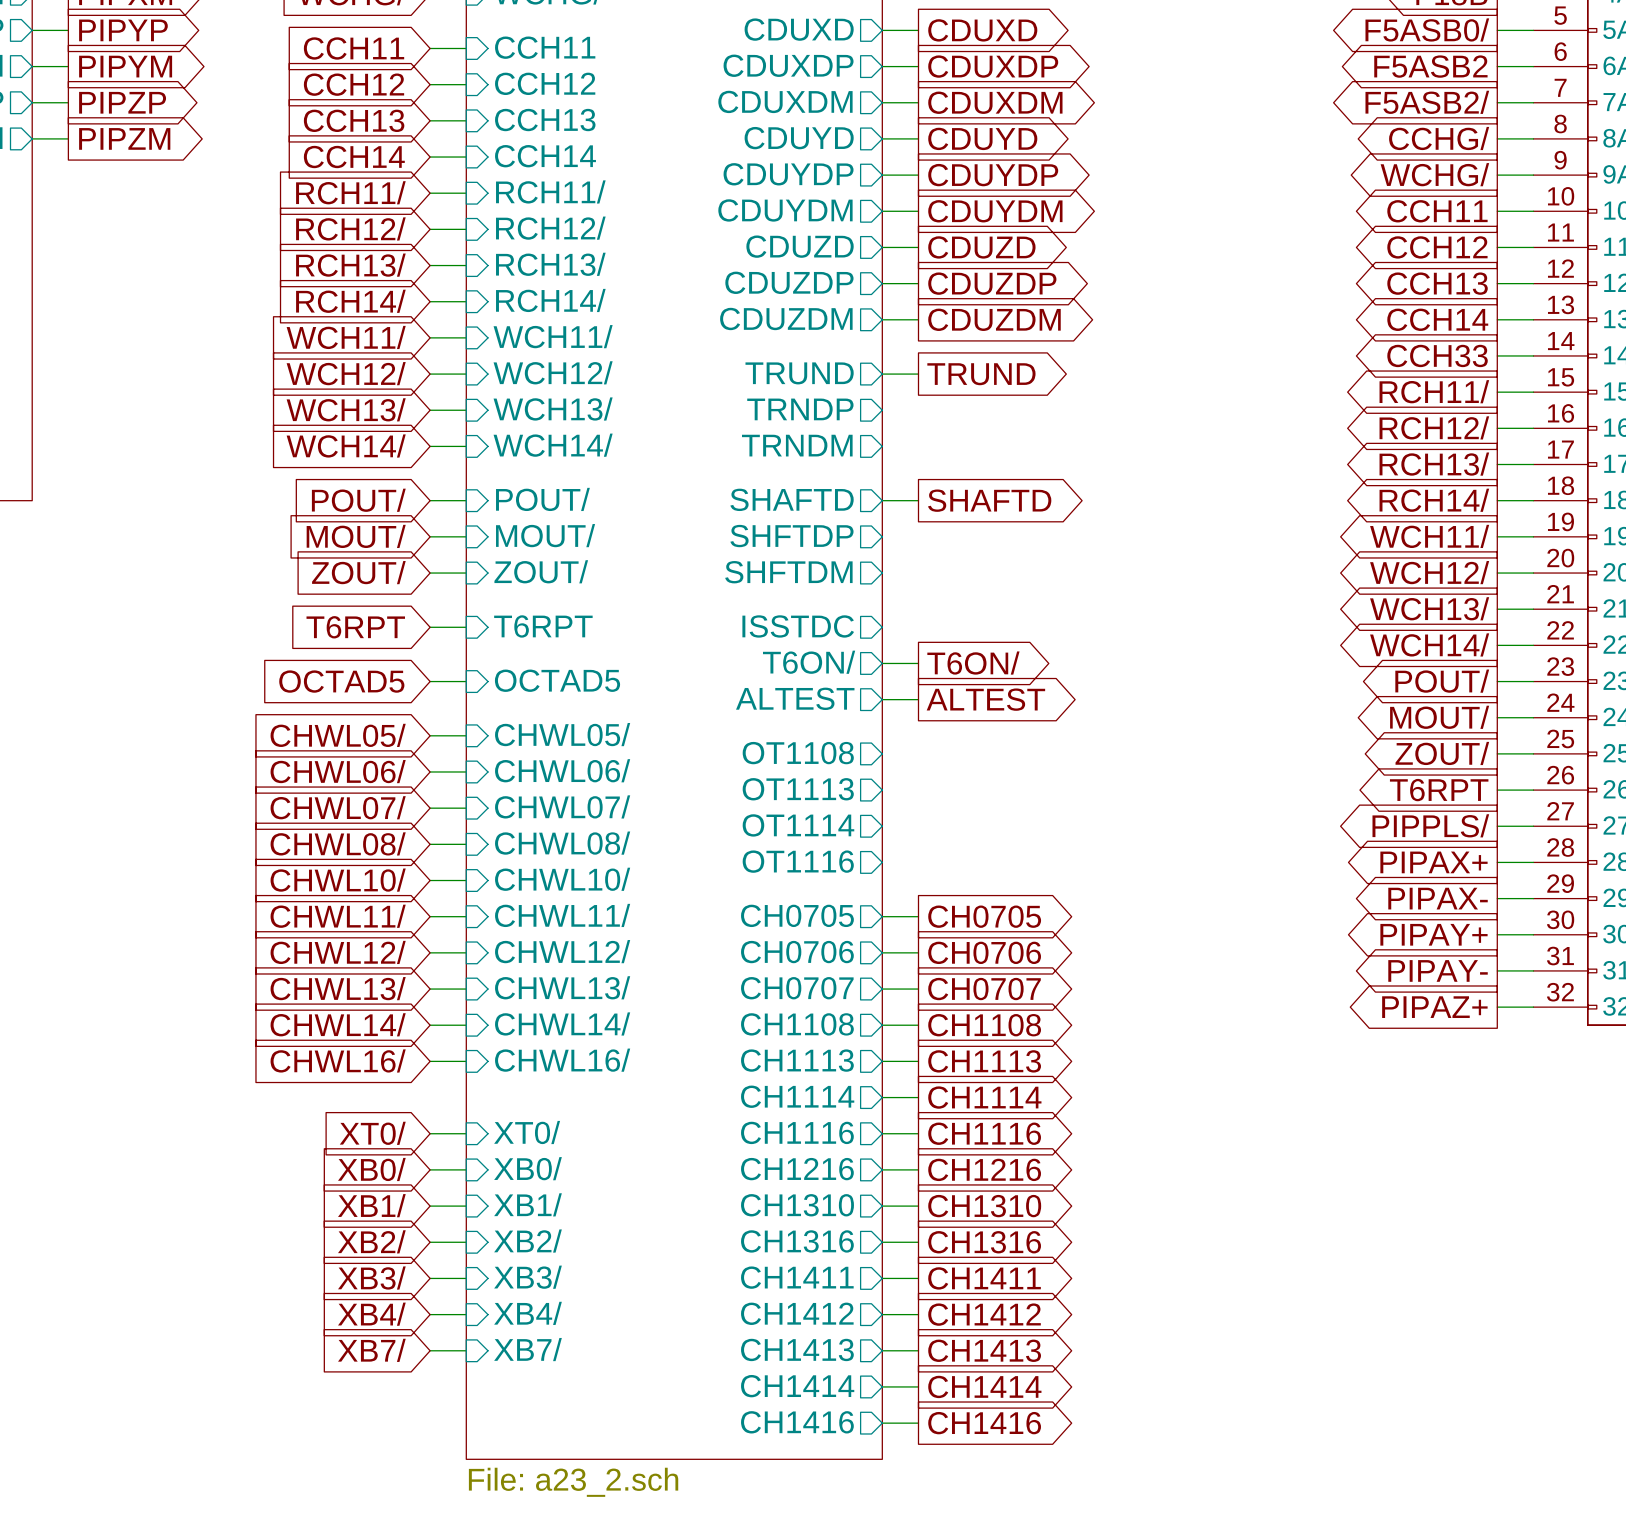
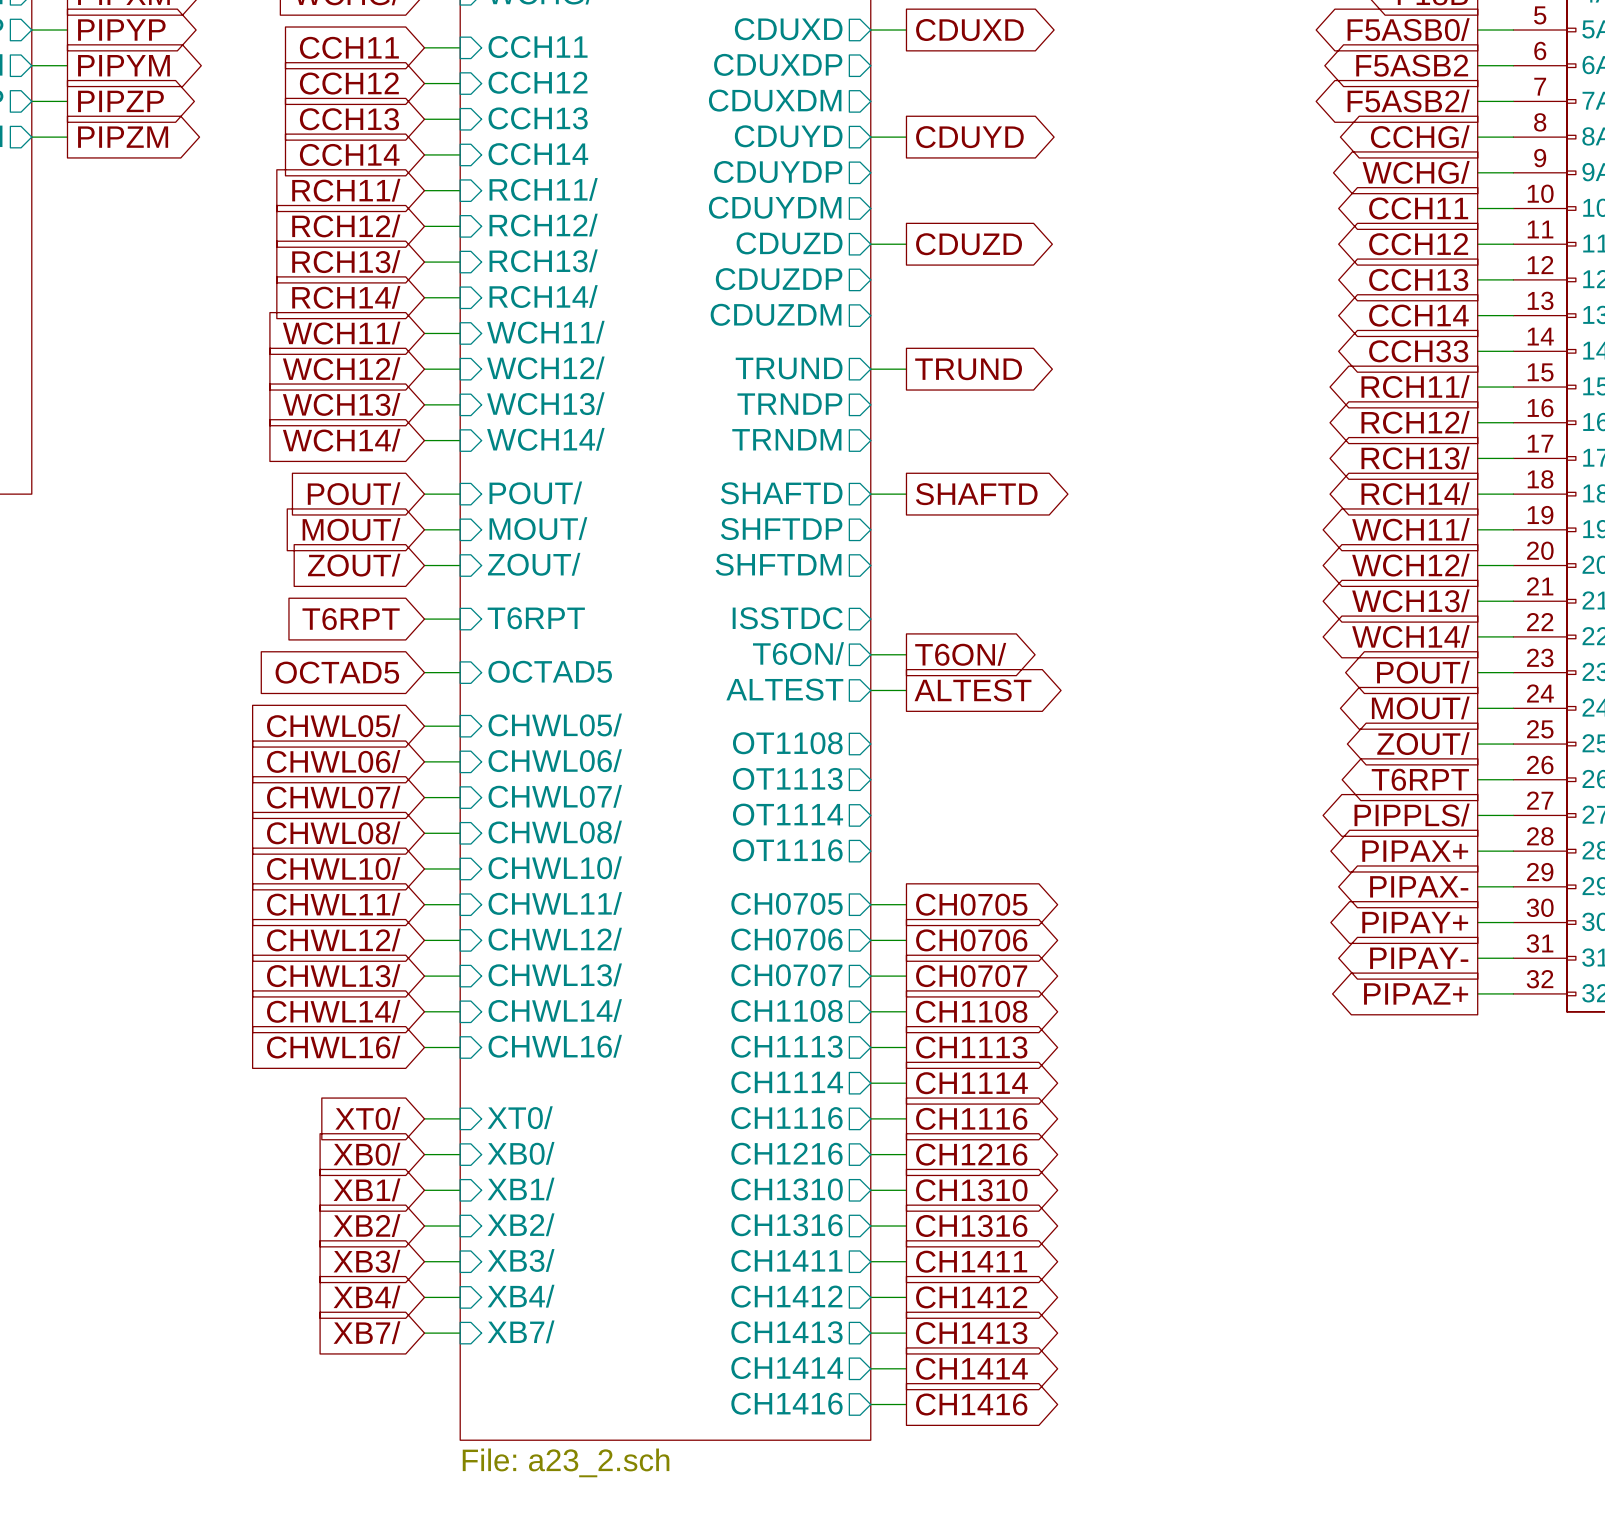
wire: (882, 66) (918, 66) -> none
global label: CDUXDP (993, 66) -> none
wire: (882, 102) (918, 102) -> none
global label: CDUXDM (995, 102) -> none
wire: (882, 175) (918, 175) -> none
global label: CDUYDP (993, 175) -> none
wire: (882, 211) (918, 211) -> none
global label: CDUYDM (995, 211) -> none
wire: (882, 283) (918, 283) -> none
global label: CDUZDP (992, 283) -> none
wire: (882, 319) (918, 319) -> none
global label: CDUZDM (994, 319) -> none

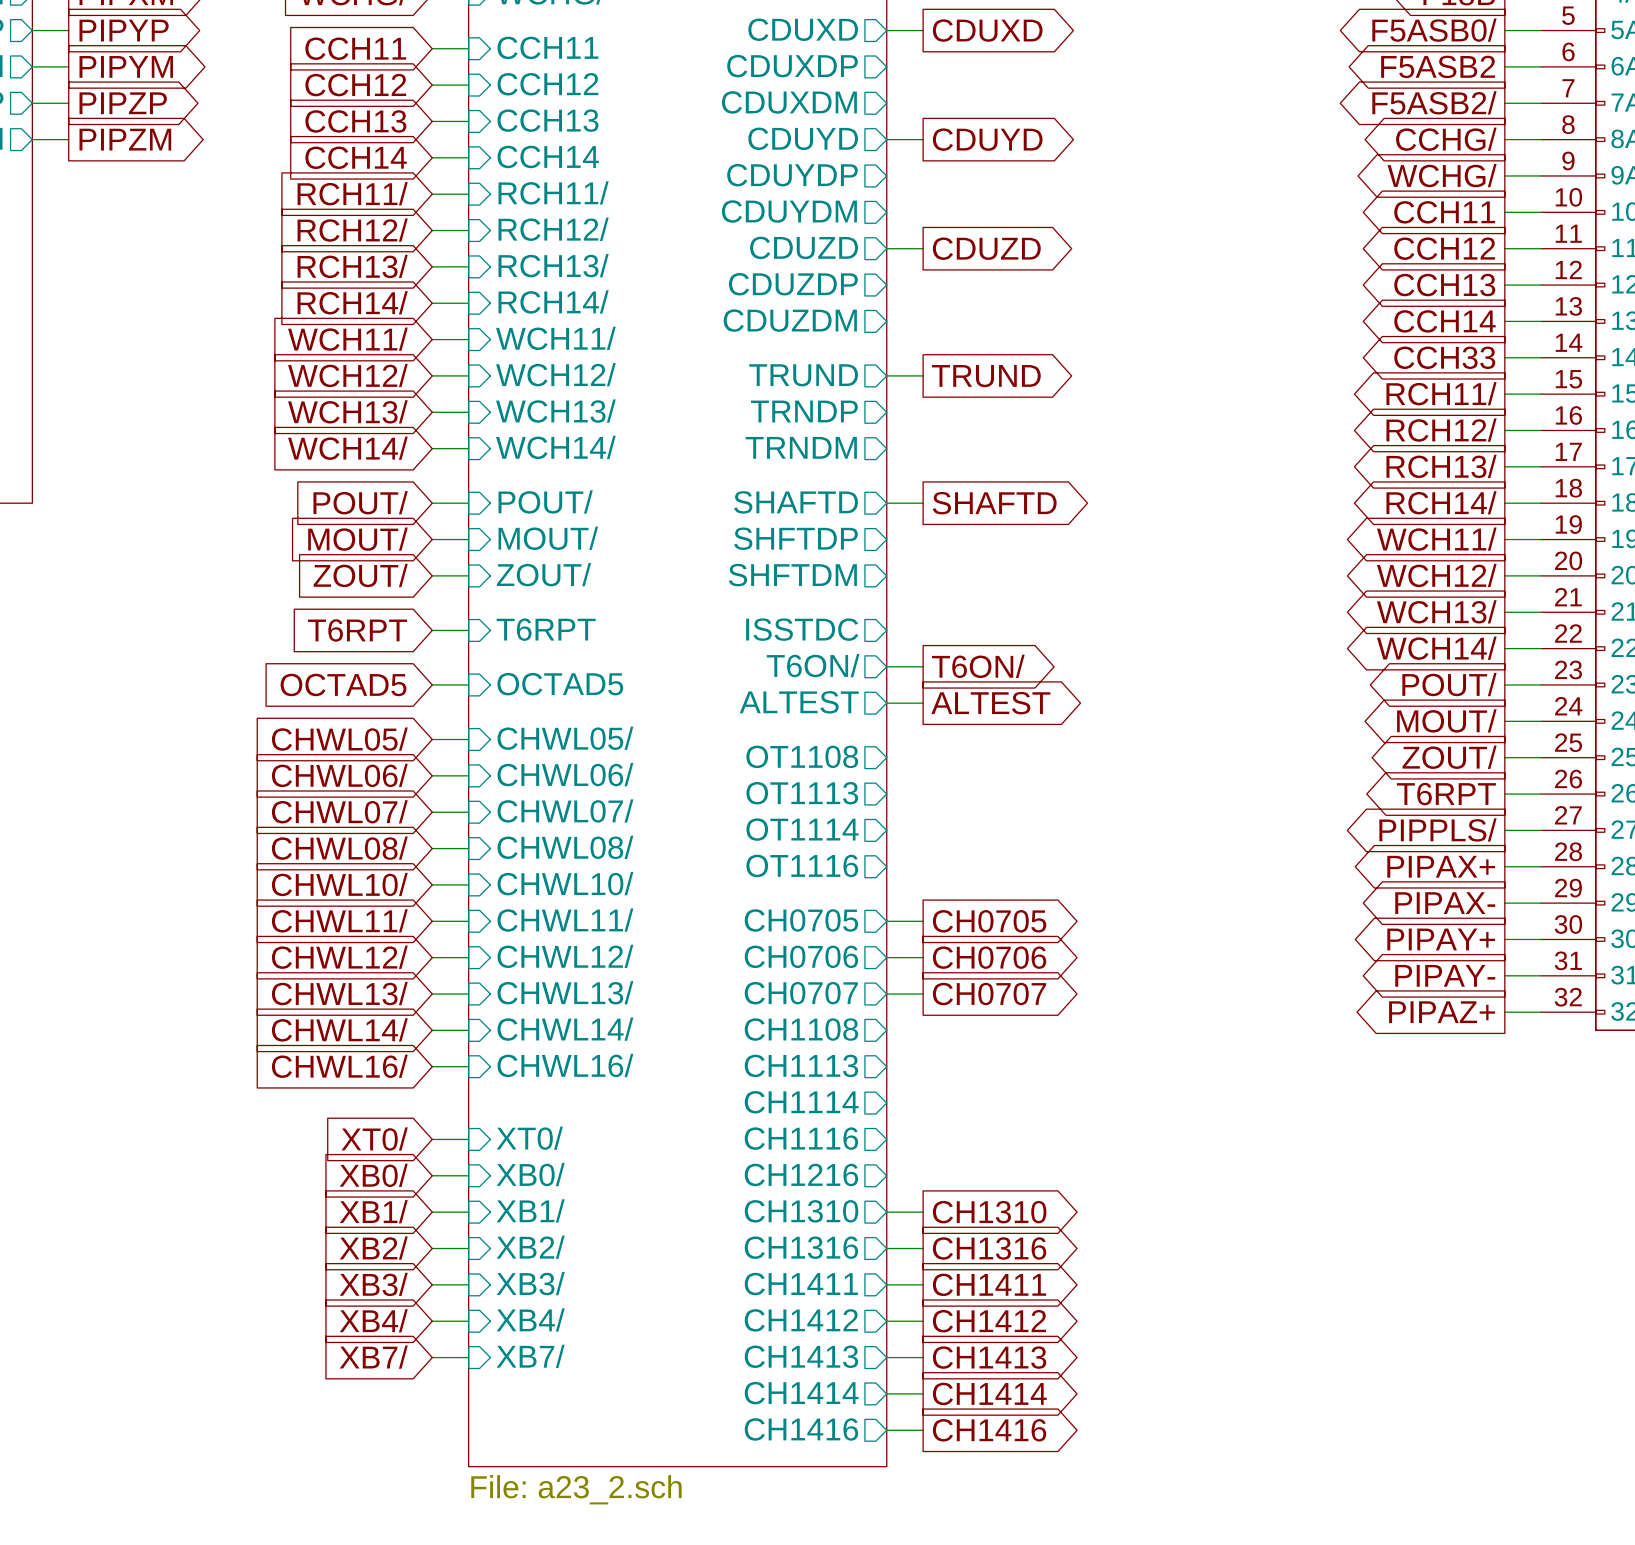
wire: (870, 1011) (906, 1011) -> none
global label: CH1108 (971, 1011) -> none
wire: (870, 1047) (906, 1047) -> none
global label: CH1113 (971, 1047) -> none
wire: (870, 1083) (906, 1083) -> none
global label: CH1114 (971, 1083) -> none
wire: (870, 1118) (906, 1118) -> none
global label: CH1116 (971, 1118) -> none
wire: (870, 1154) (906, 1154) -> none
global label: CH1216 (971, 1154) -> none

